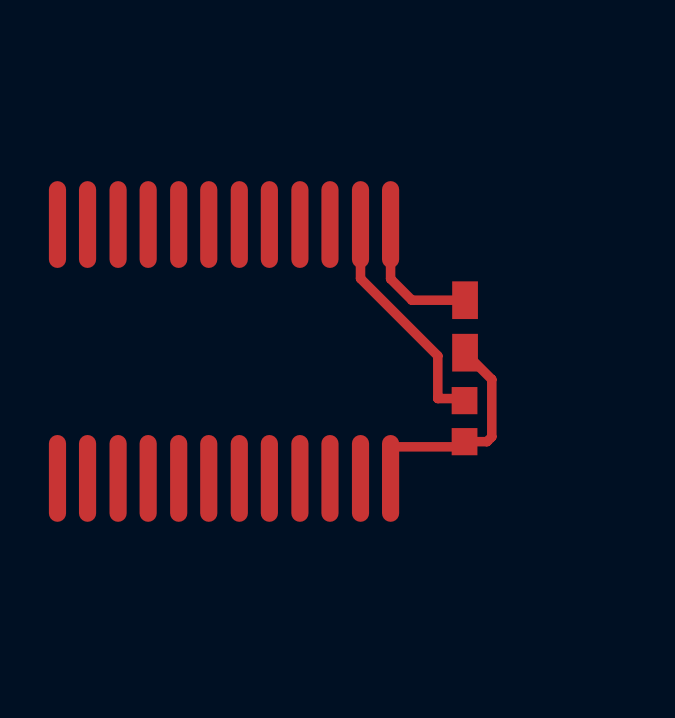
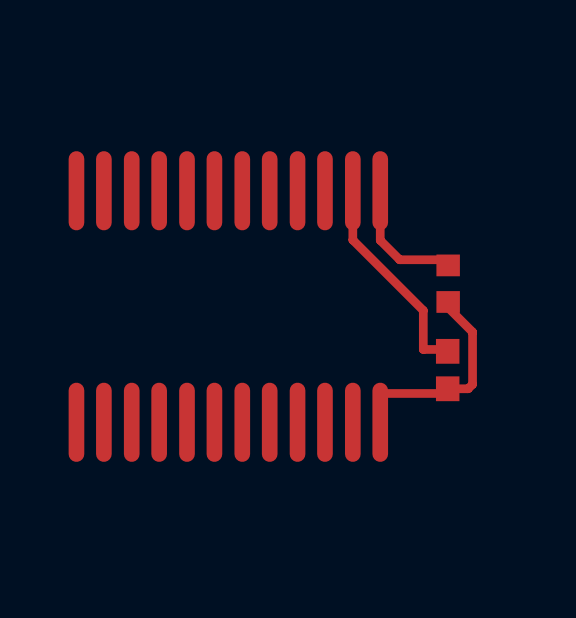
part footprint: [452, 281, 478, 372] -> [436, 254, 460, 313]

